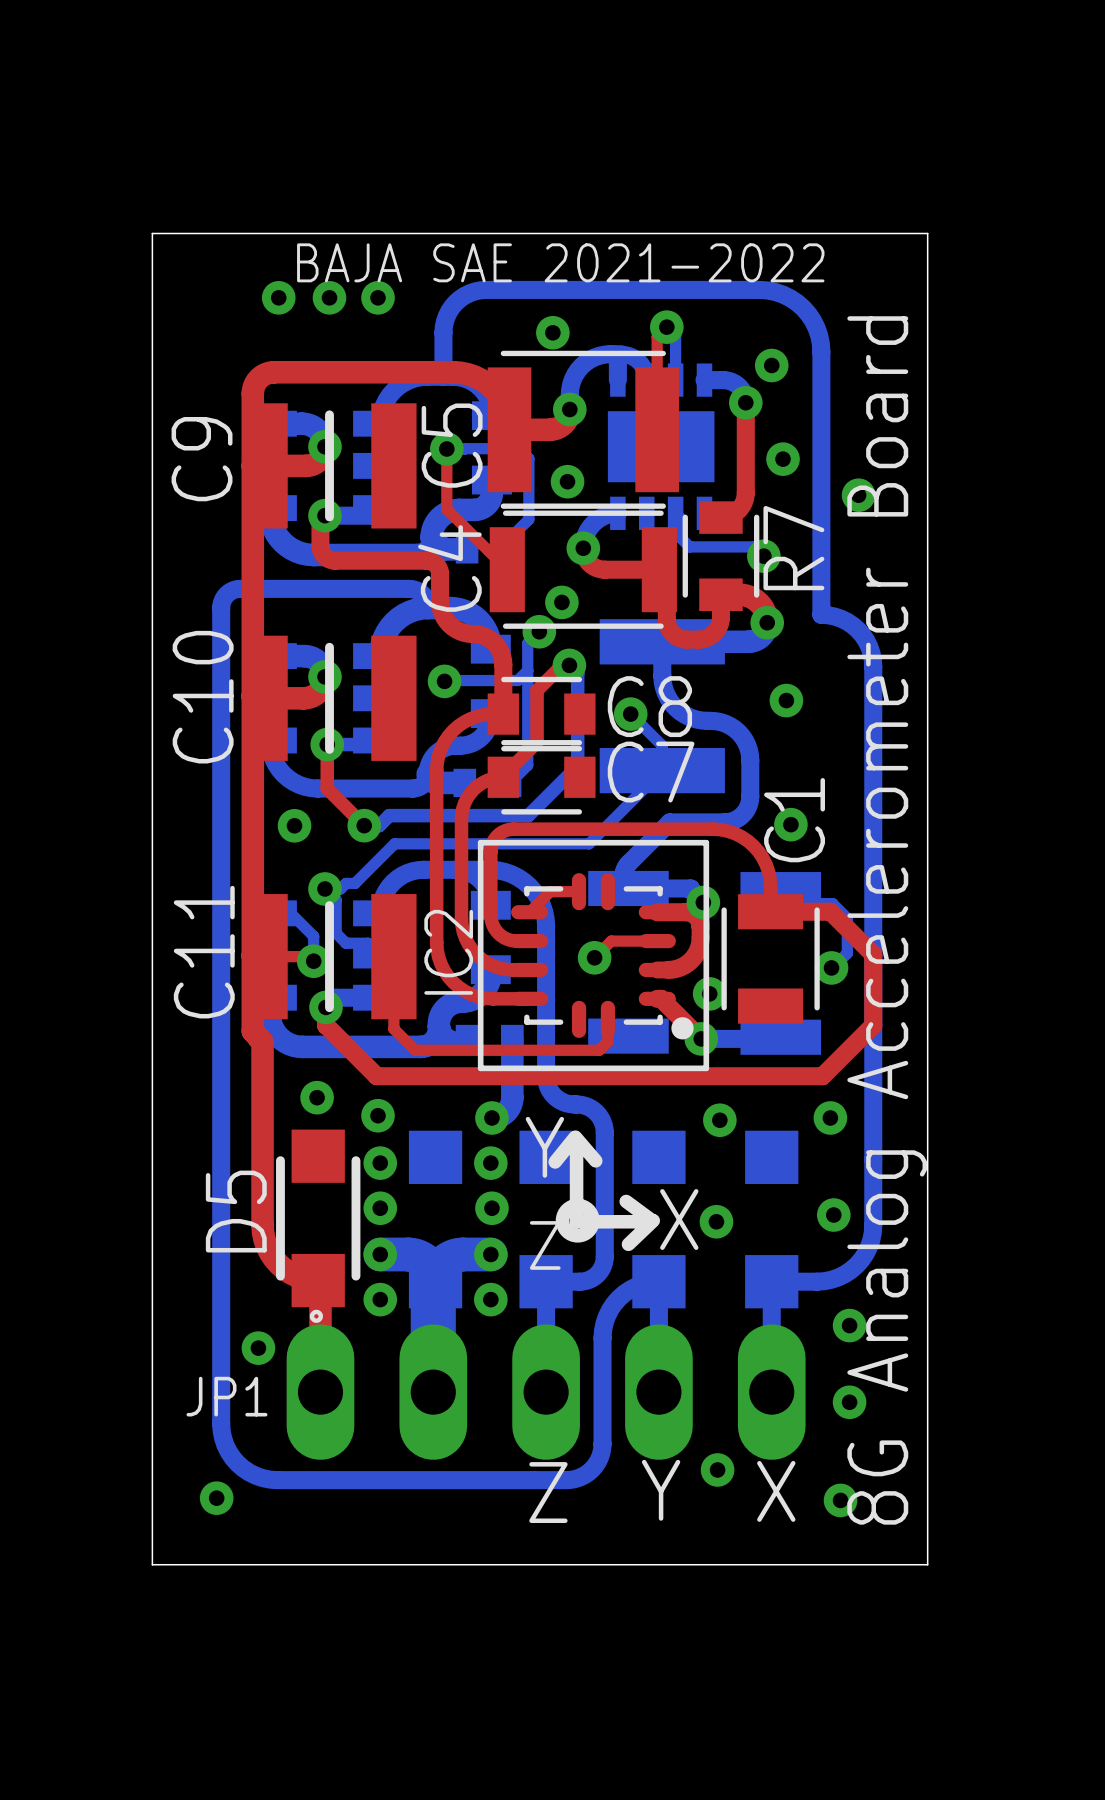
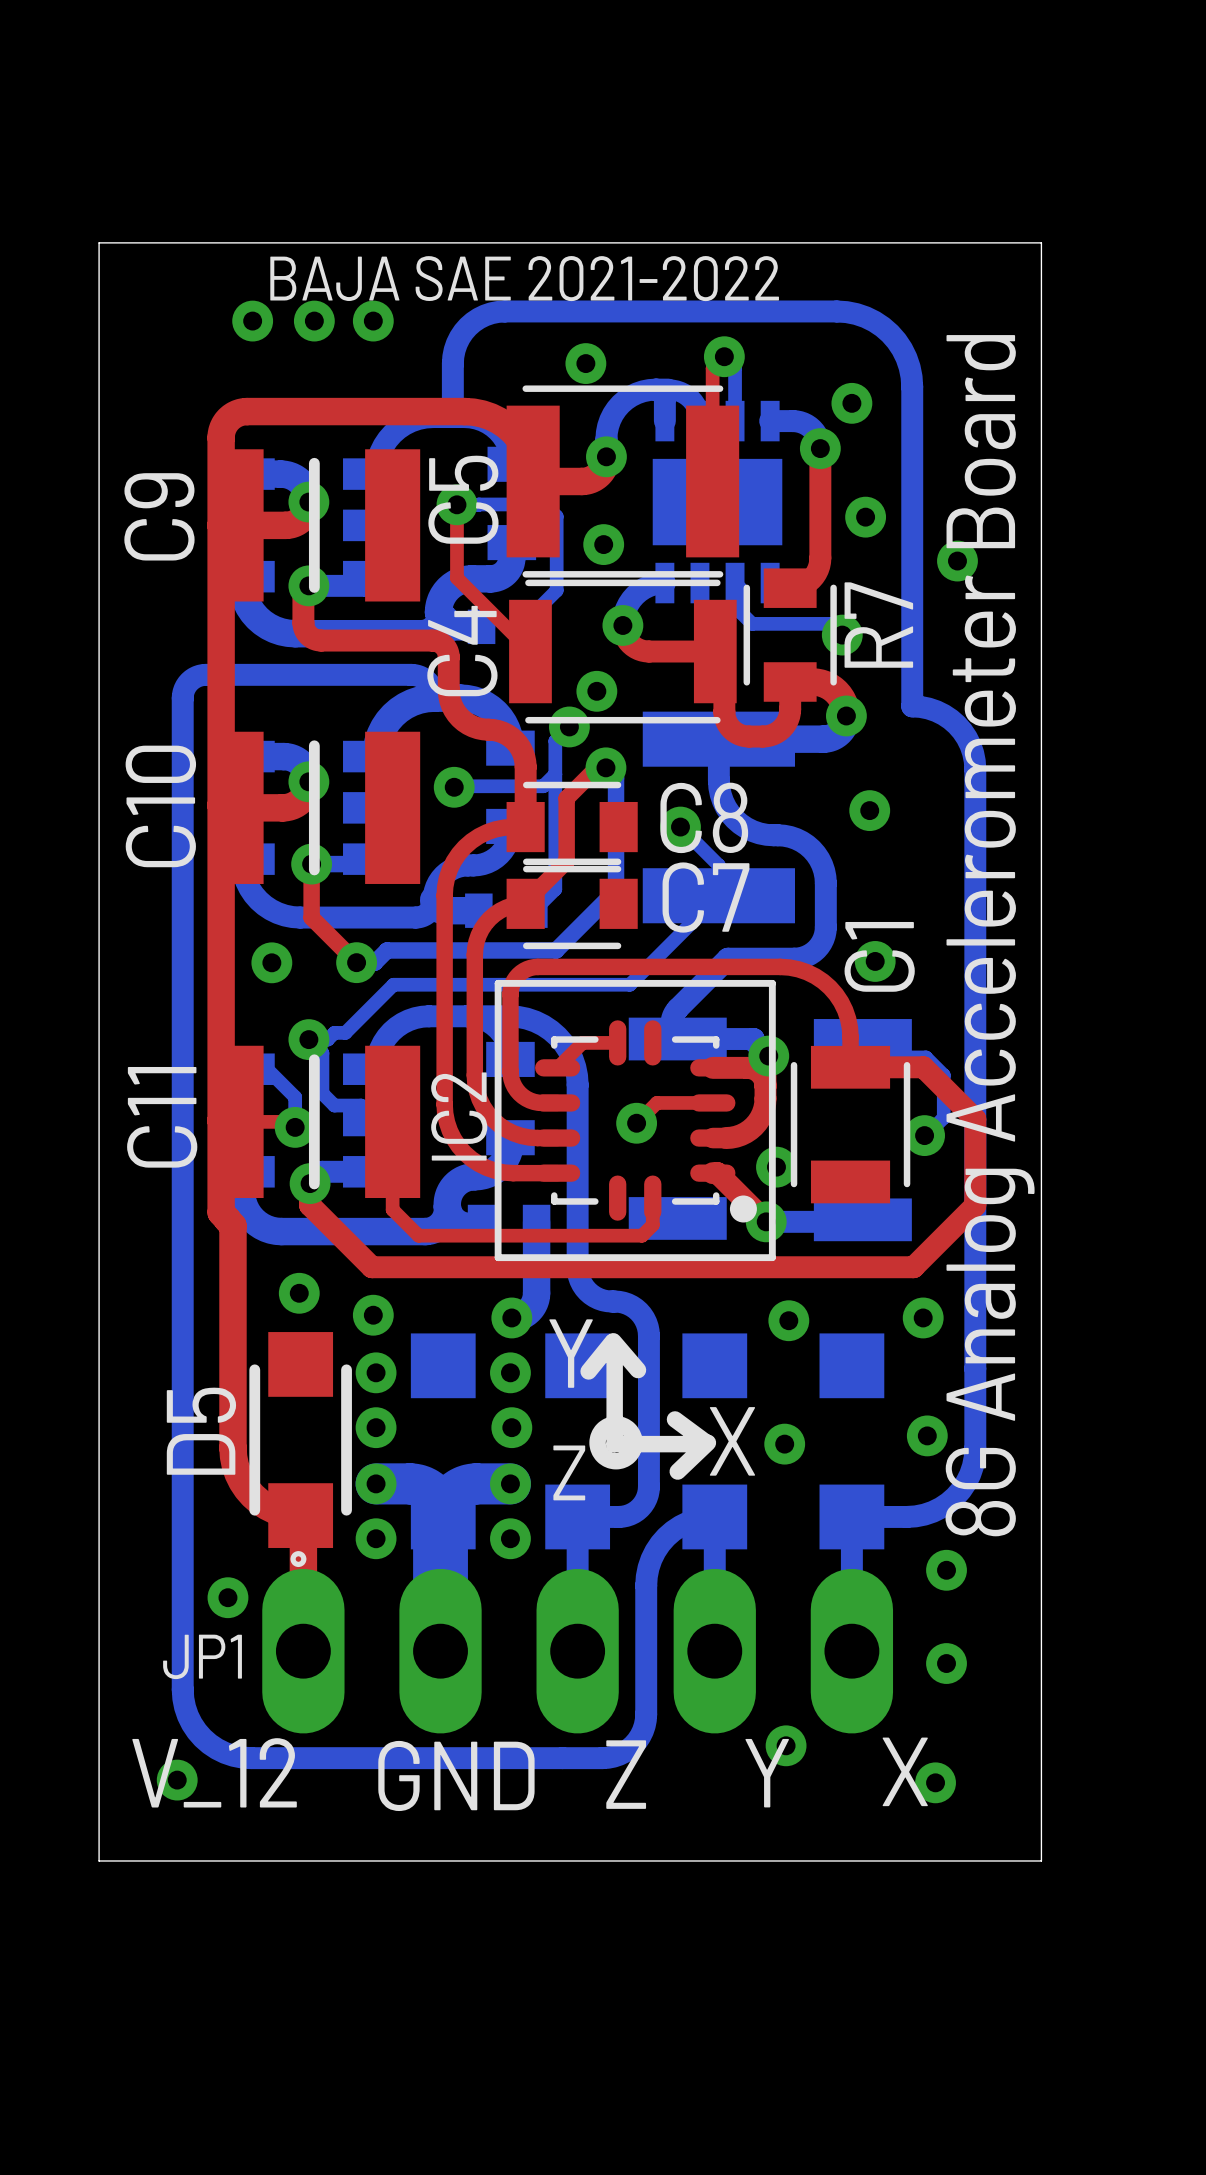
text position: Y (661, 1490) -> Y (767, 1773)
text position: X (776, 1491) -> X (905, 1771)
text position: Z (548, 1492) -> Z (626, 1774)
text: none -> GND (456, 1775)
text: none -> V_12 (214, 1772)

